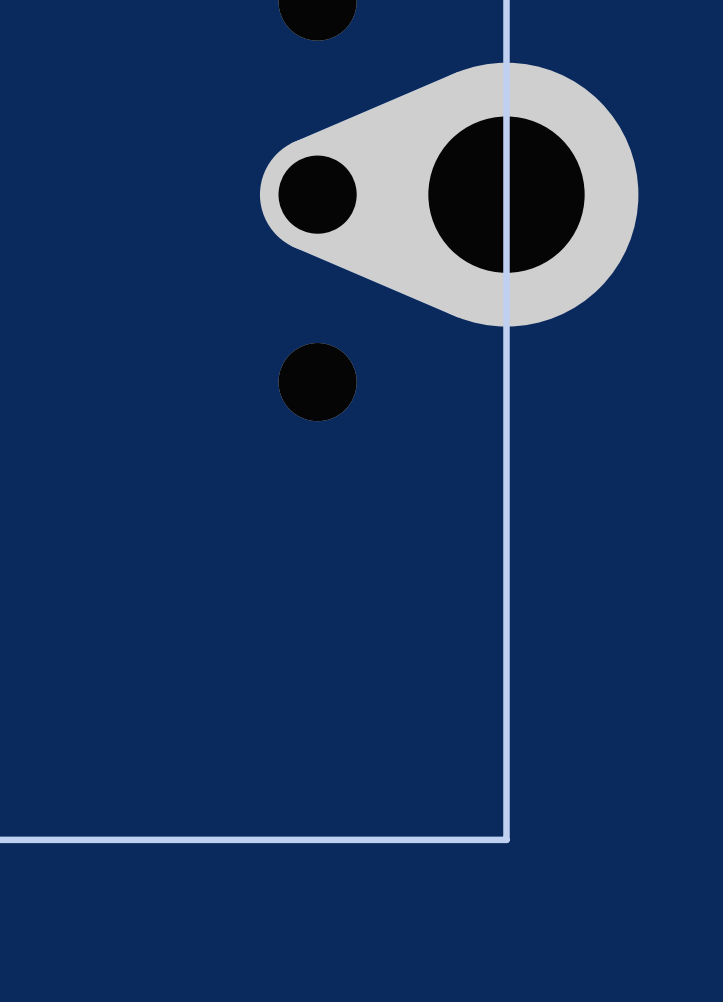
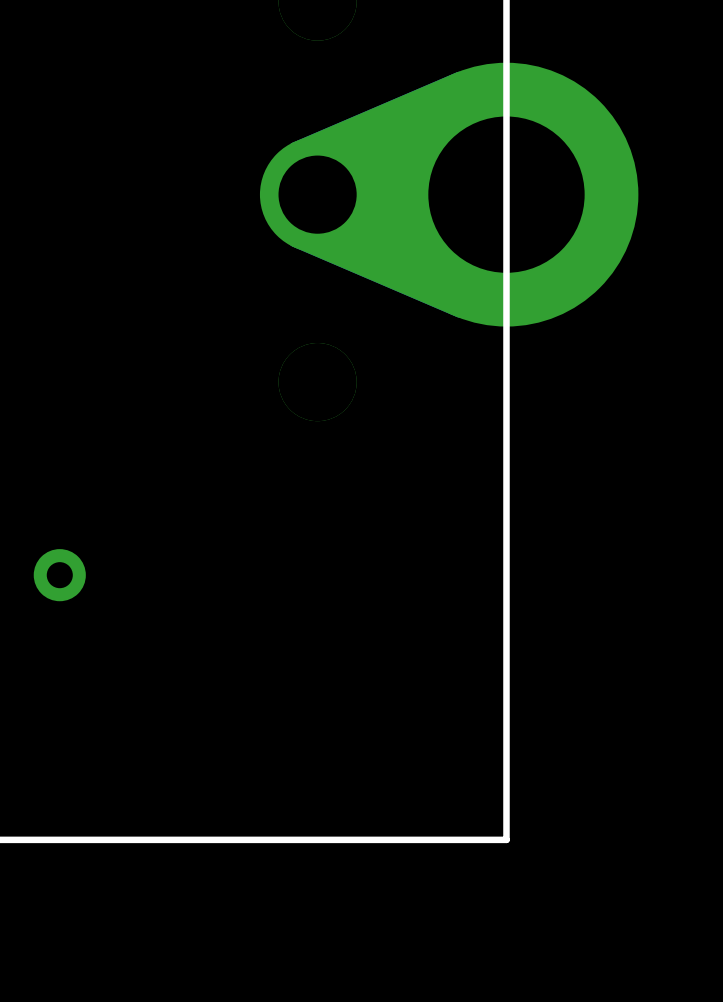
via: none -> (59, 575)

